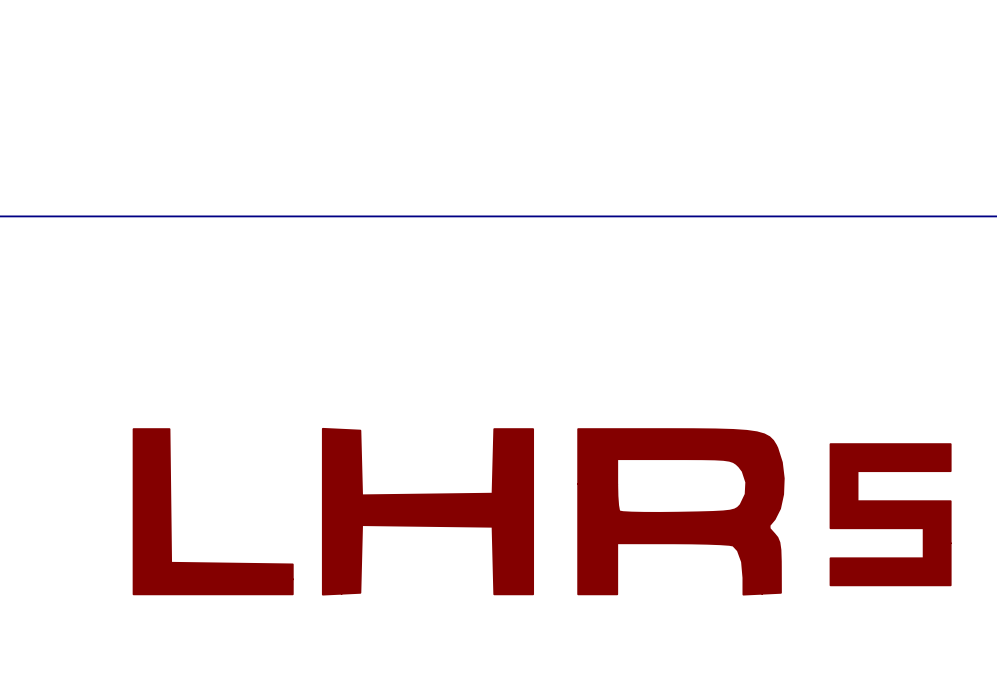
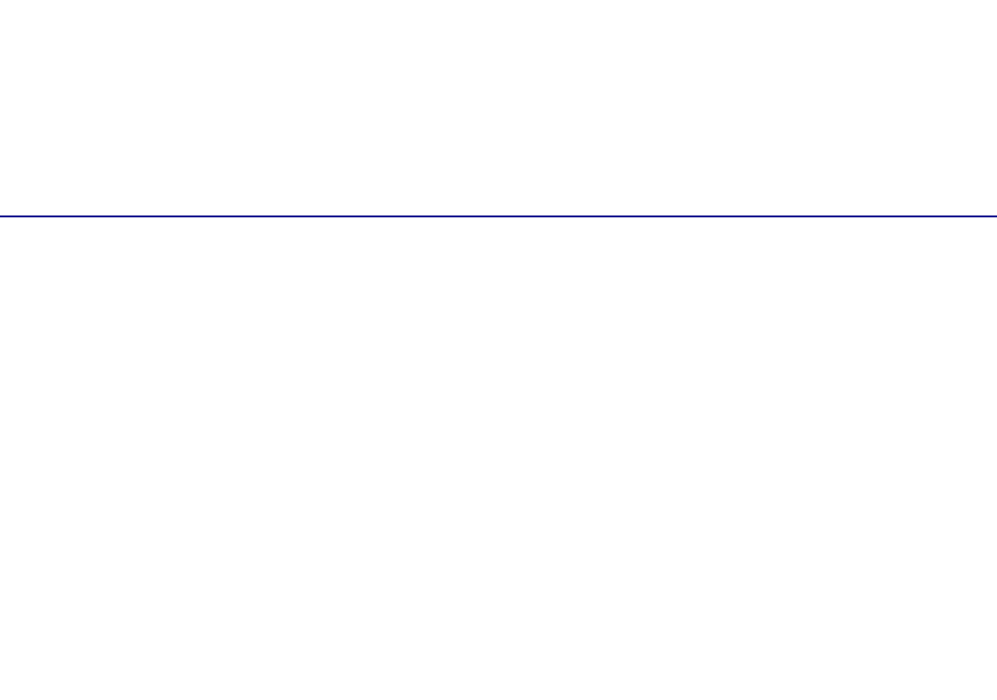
drawing: [133, 428, 951, 595] -> none

